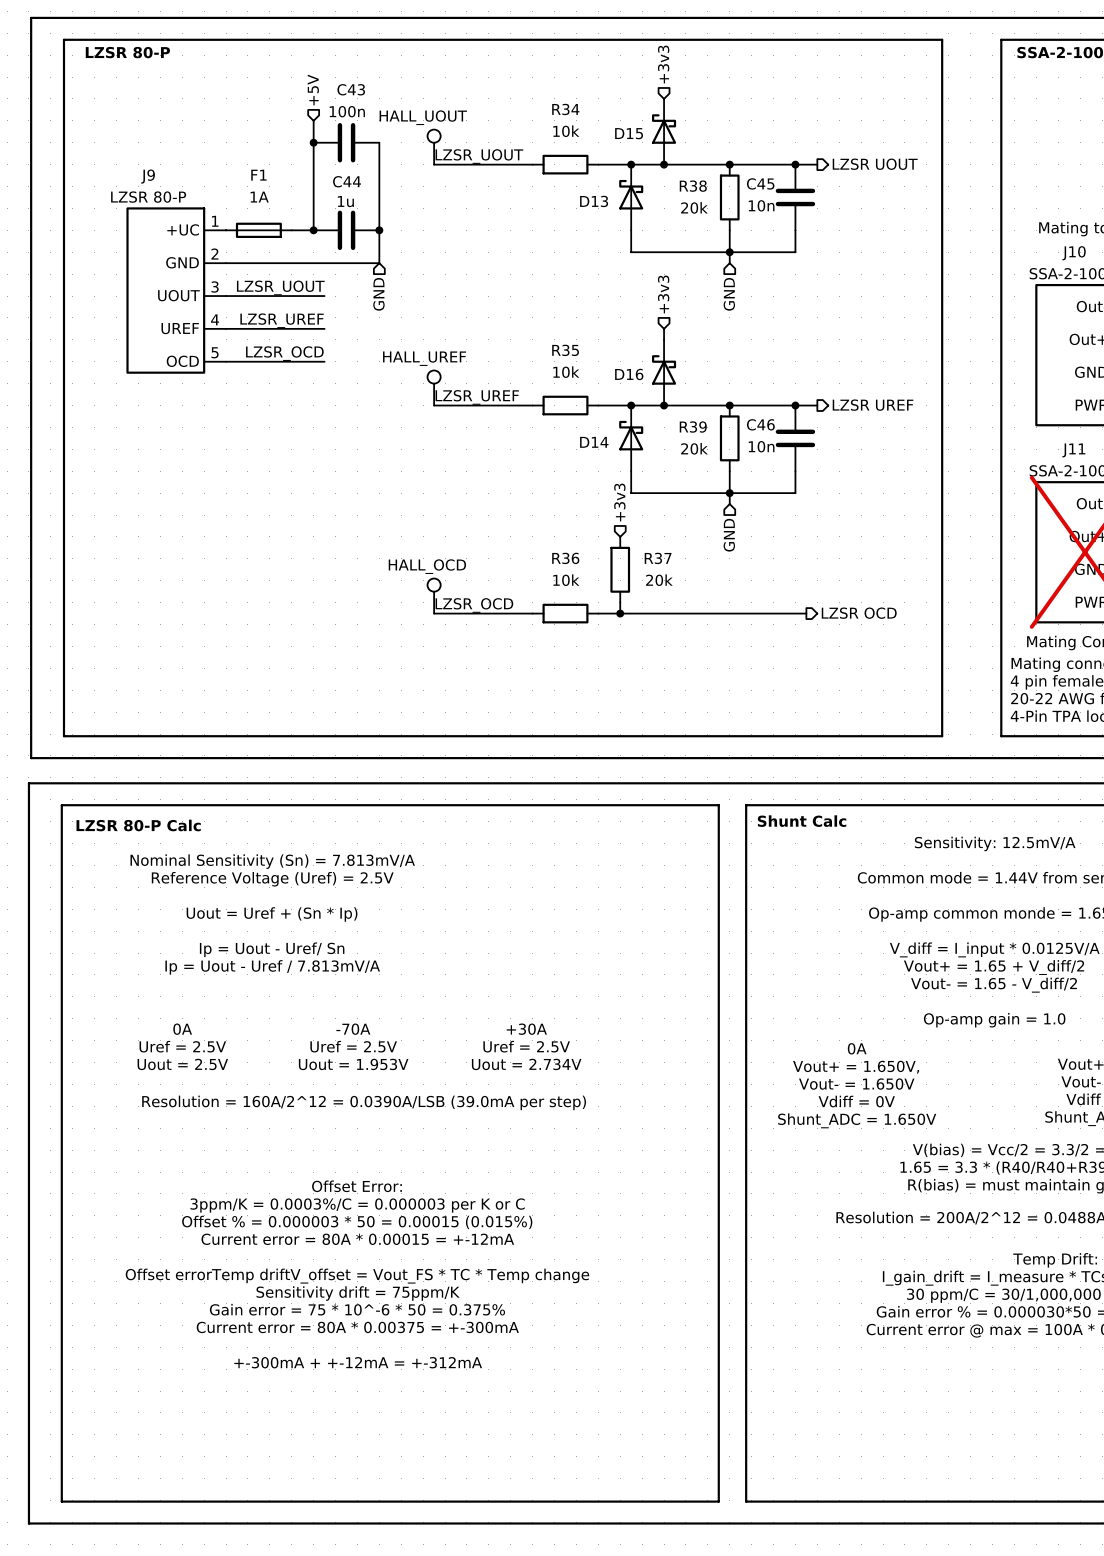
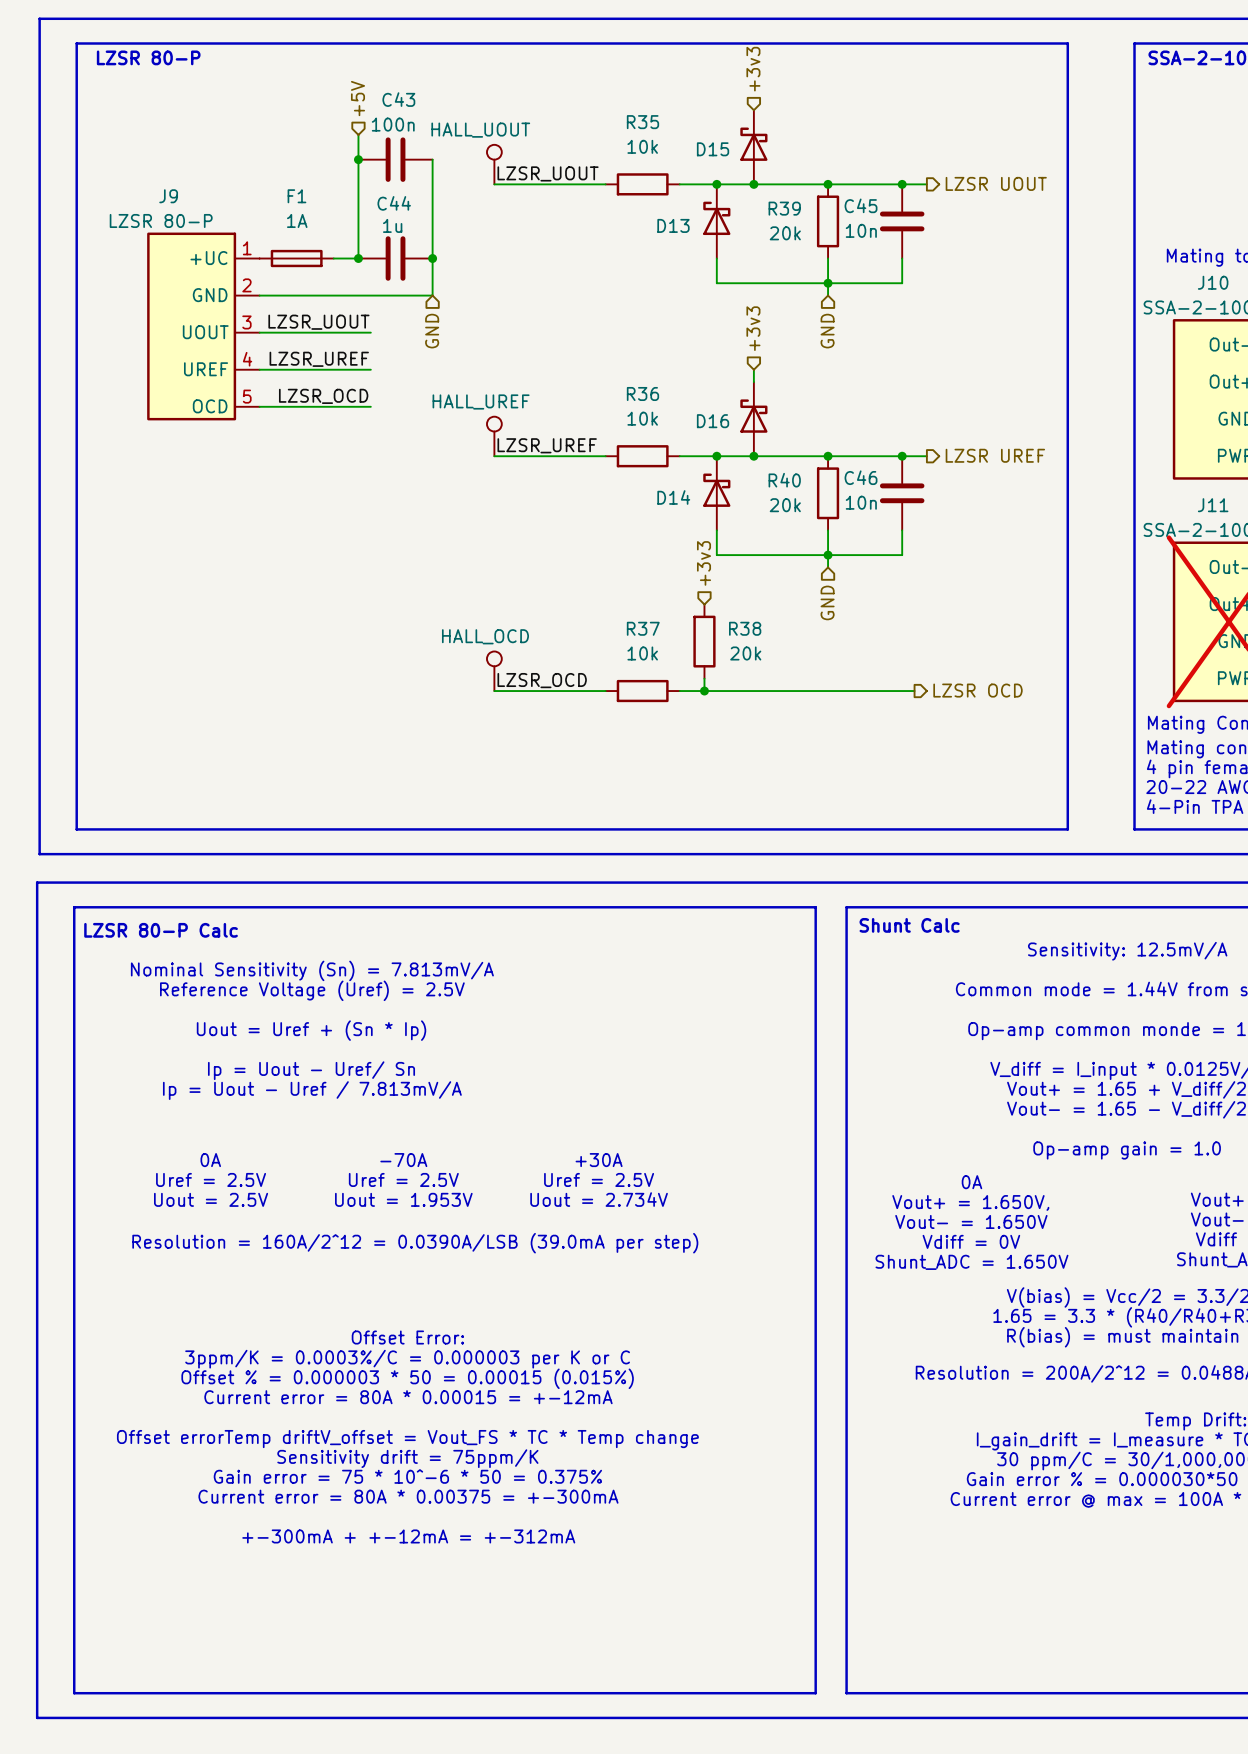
R34 name: R34 (565, 109) -> R35 (642, 122)
R38 name: R38 (693, 186) -> R39 (784, 208)
R35 name: R35 (565, 350) -> R36 (642, 393)
R39 name: R39 (693, 427) -> R40 (784, 480)
R36 name: R36 (565, 558) -> R37 (643, 628)
R37 name: R37 (658, 558) -> R38 (745, 628)

